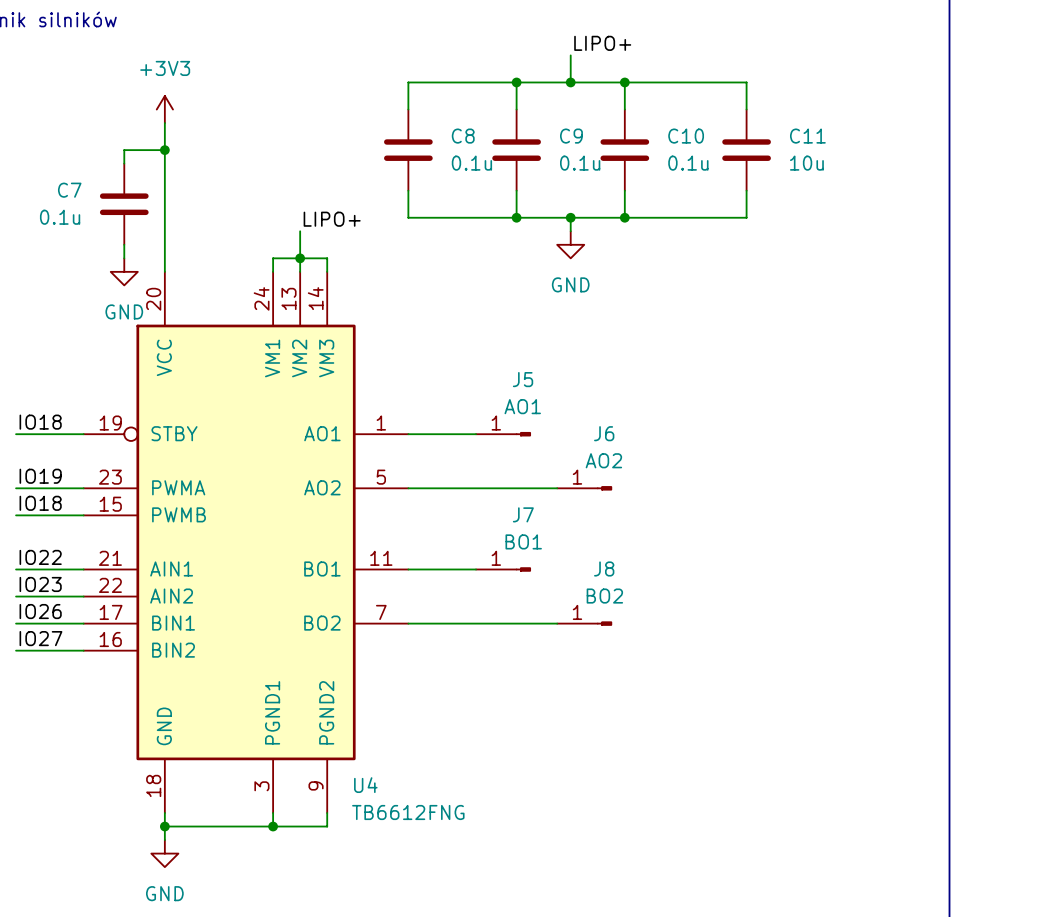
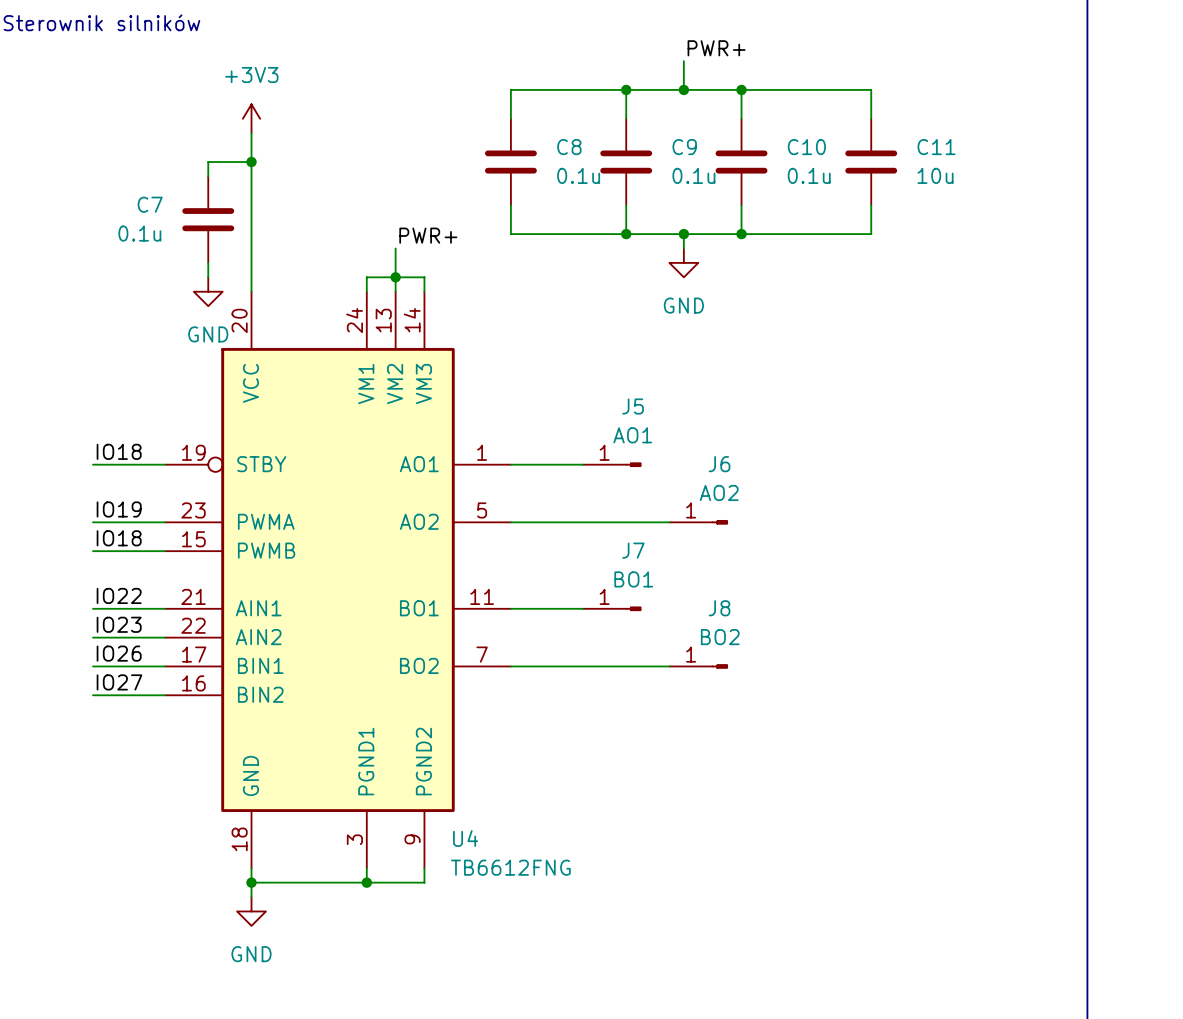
label: LIPO+ (602, 43) -> PWR+ (716, 48)
label: LIPO+ (332, 219) -> PWR+ (428, 235)

